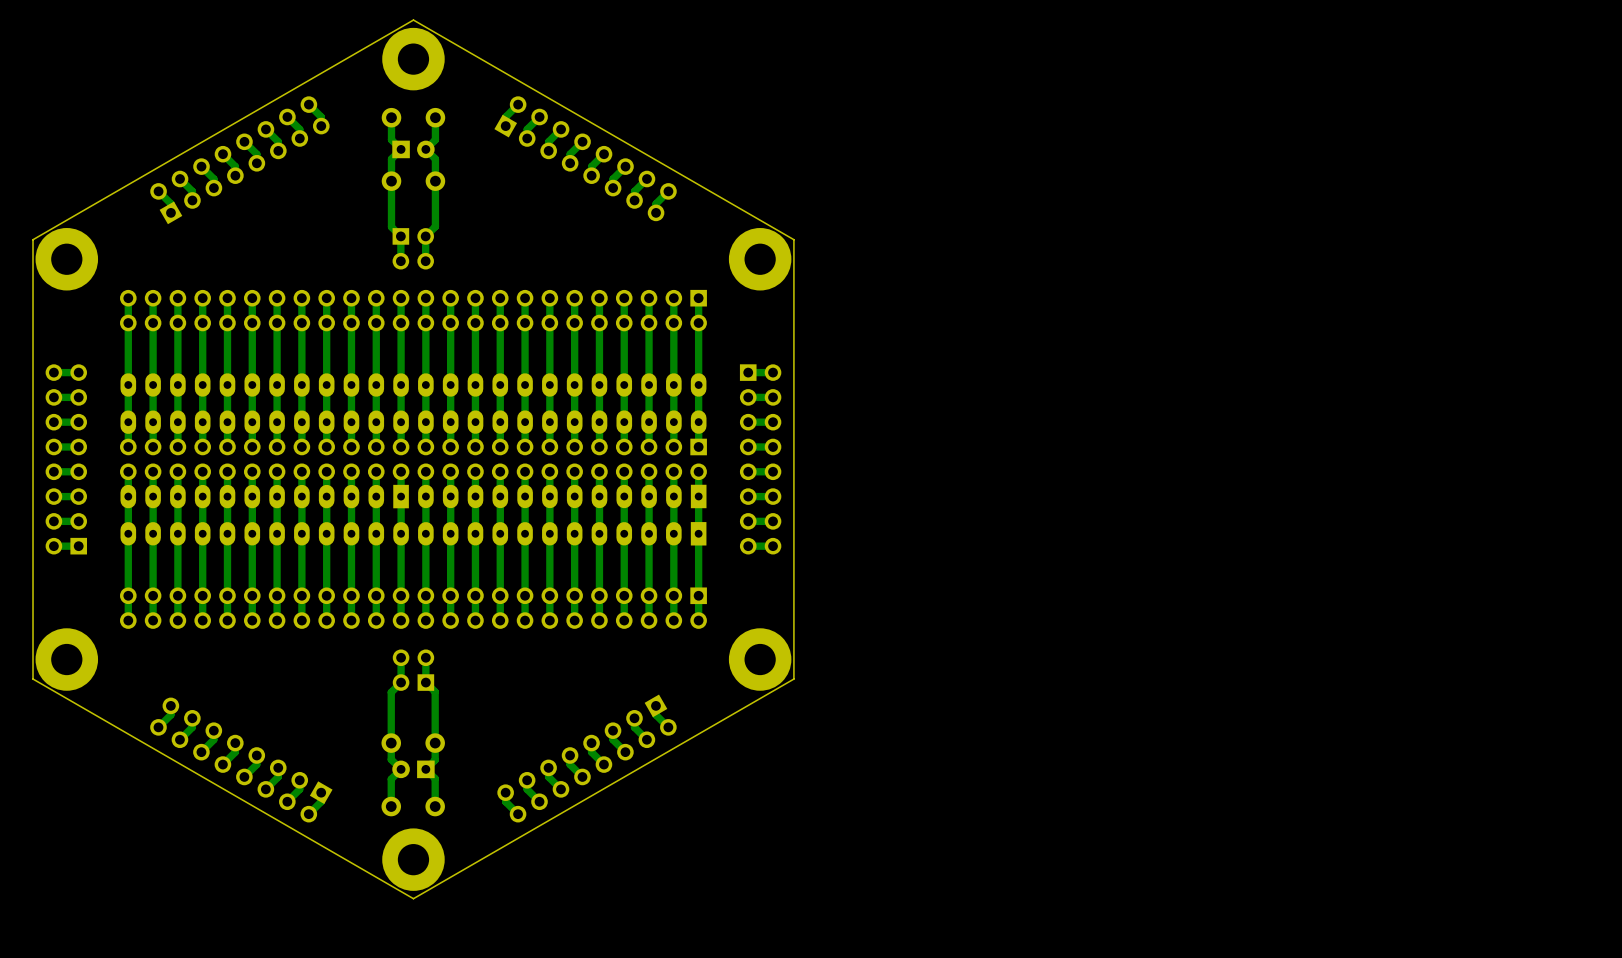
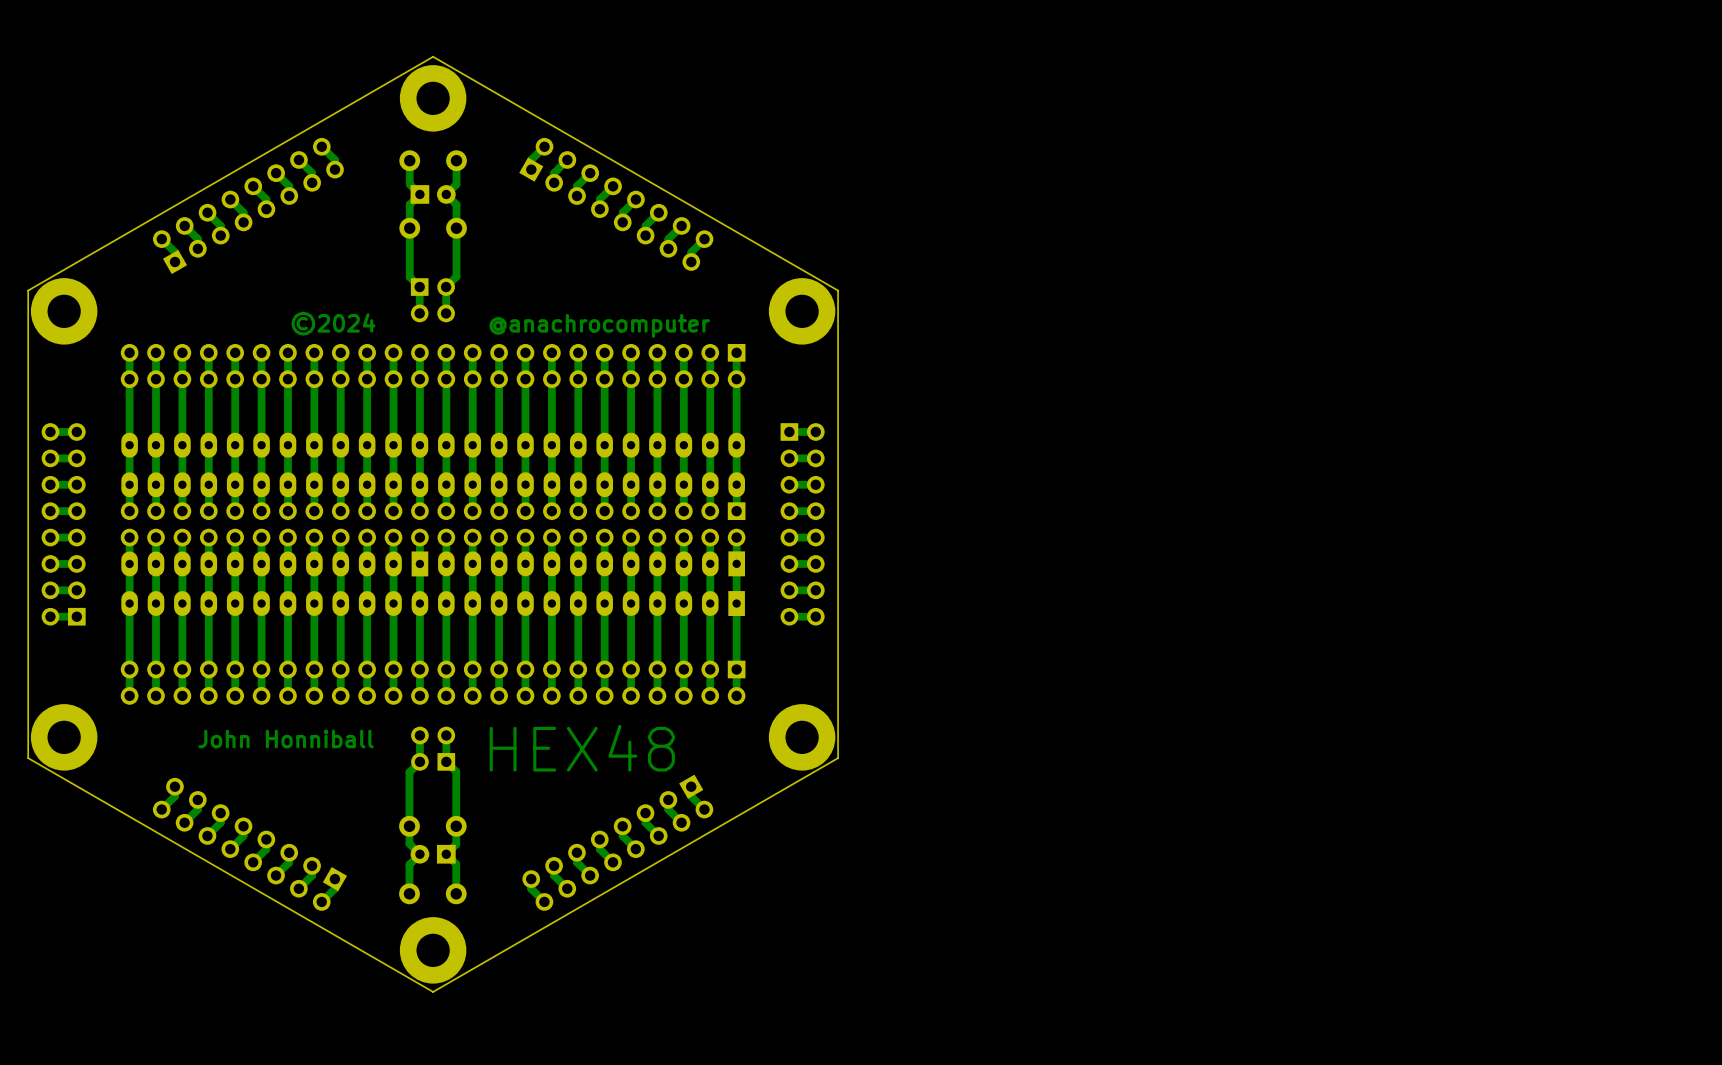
text: none -> ©2024 (333, 323)
text: none -> @anachrocomputer (599, 325)
text: none -> John Honniball (285, 738)
text: none -> HEX48 (582, 748)

